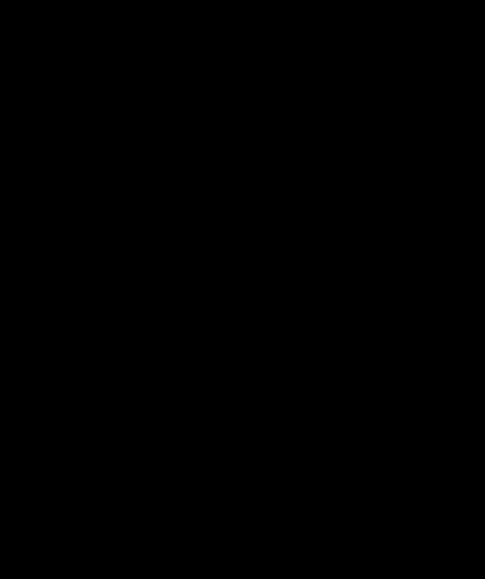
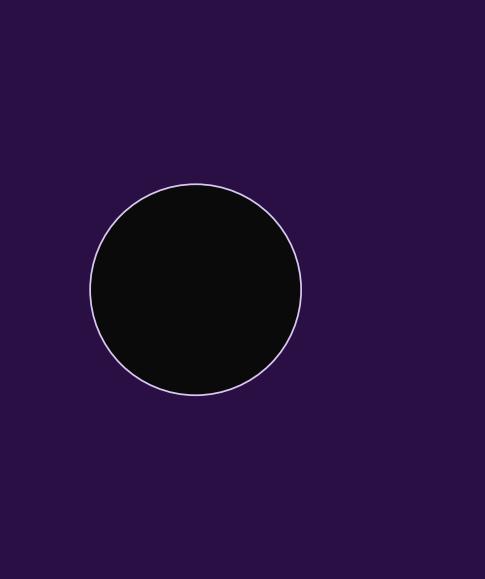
part: none -> (195, 289)

